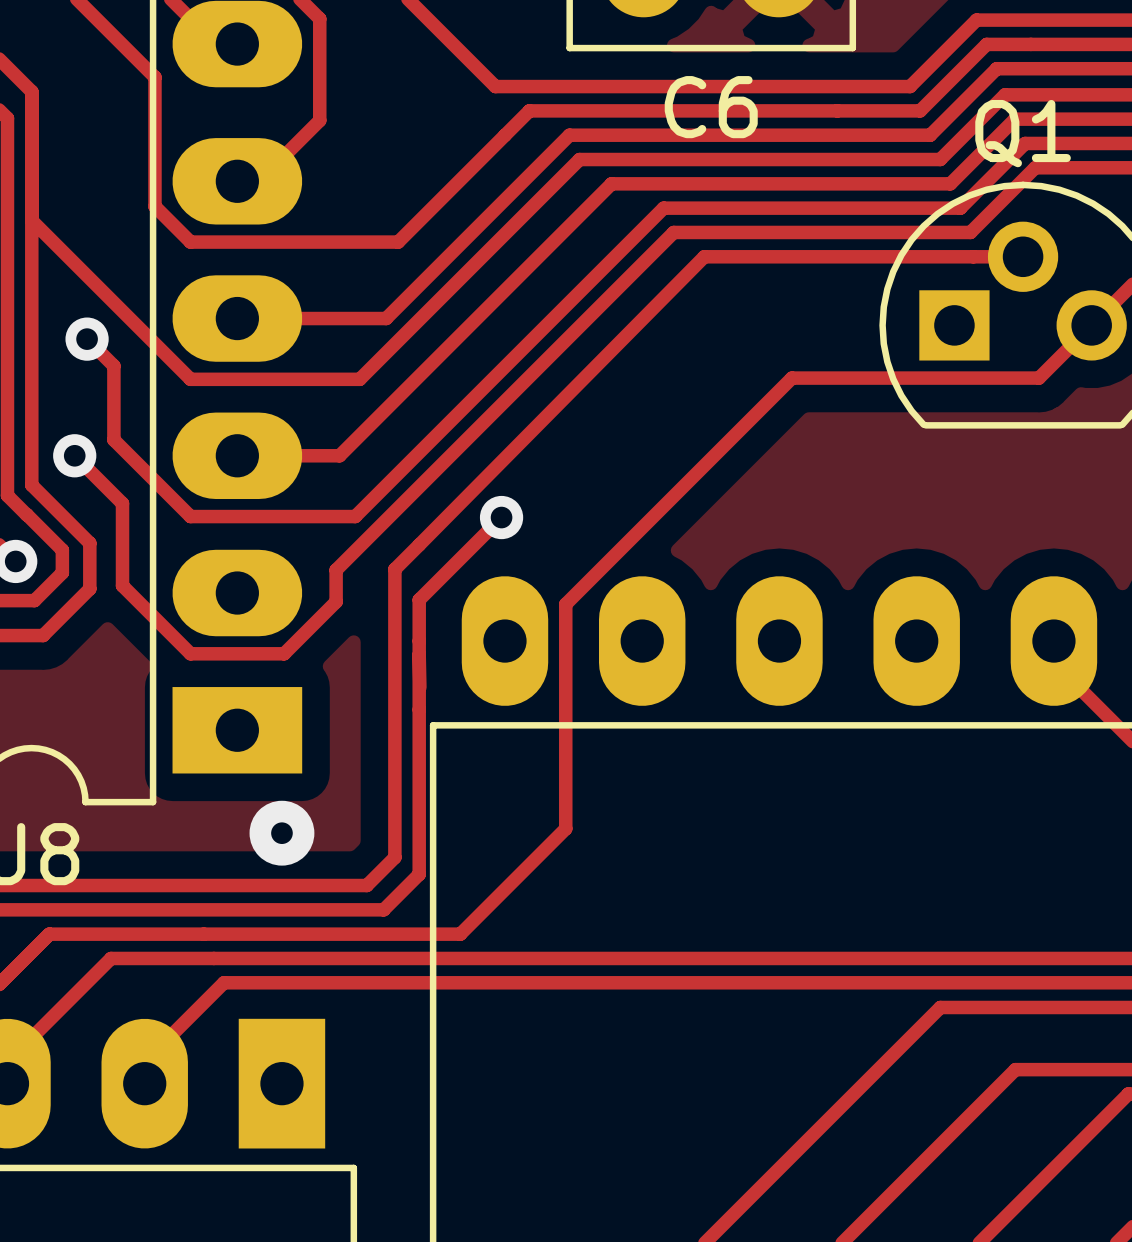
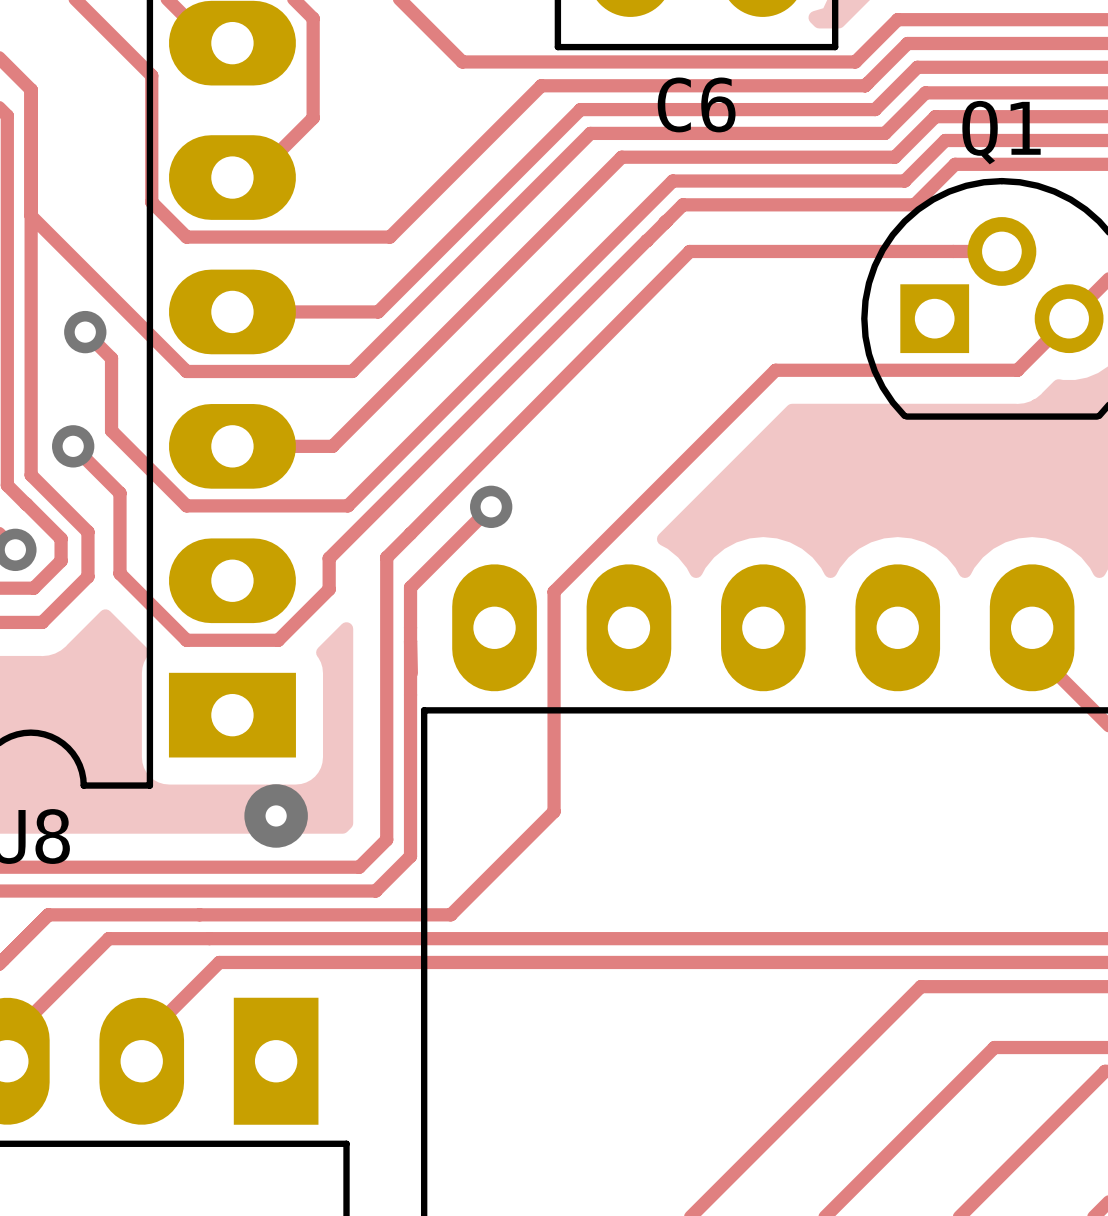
track: (976, 20) (910, 86) (495, 86) (472, 63) -> (956, 19) (897, 19) (855, 61) (462, 61)
track: (986, 44) (920, 110) (529, 110) -> (966, 43) (907, 43) (865, 85) (541, 85) (518, 108)
track: (996, 68) (930, 135) (569, 135) -> (976, 67) (917, 67) (875, 109) (580, 109) (557, 132)
track: (1004, 94) (940, 159) (579, 159) -> (984, 92) (925, 92) (885, 133) (590, 133) (567, 156)
track: (1015, 119) (950, 183) (611, 183) -> (994, 116) (935, 116) (894, 157) (621, 157) (598, 180)
track: (1025, 143) (960, 208) (663, 208) -> (1003, 140) (945, 140) (904, 181) (672, 181) (649, 203)
track: (1035, 167) (970, 232) (673, 232) -> (1013, 164) (955, 164) (914, 204) (682, 204) (659, 227)

